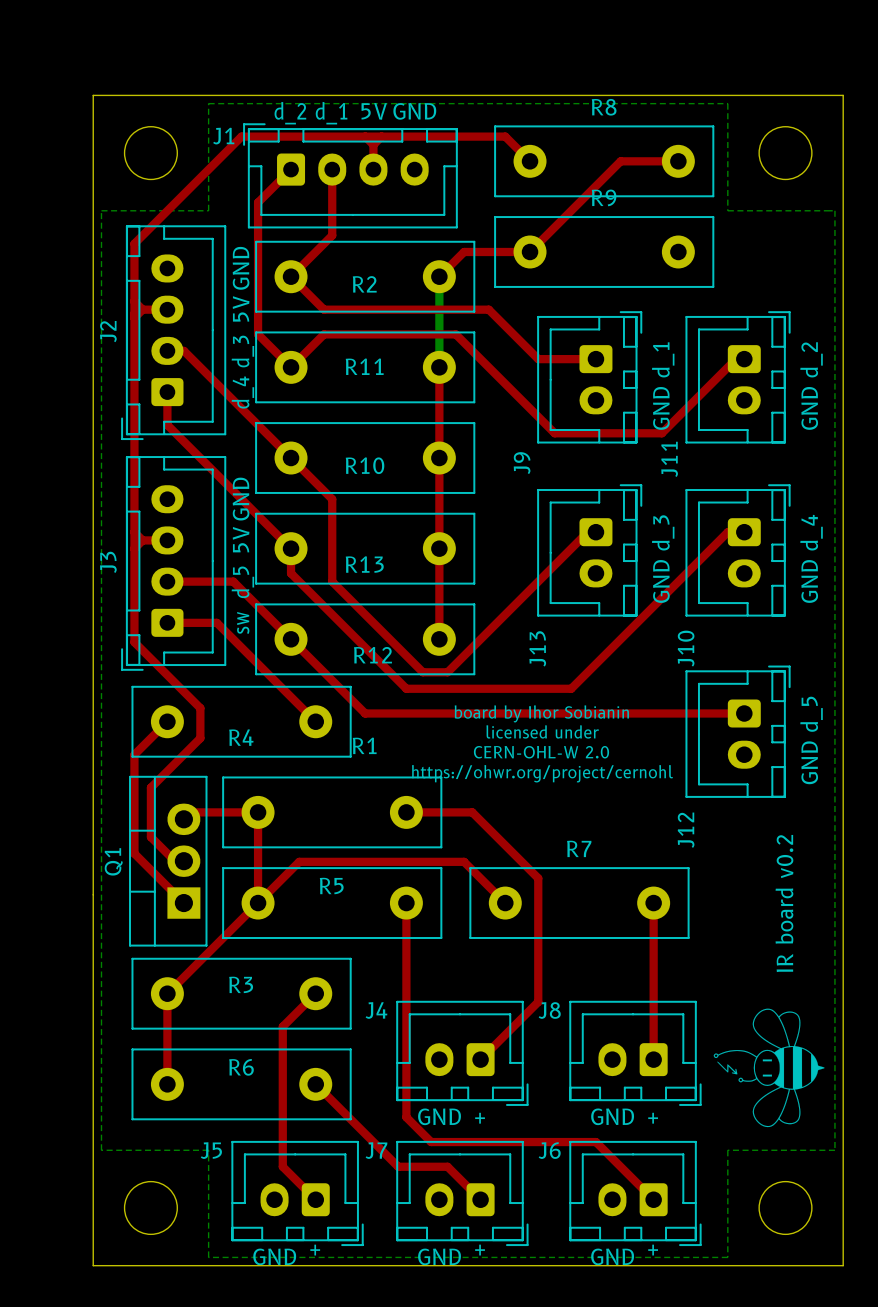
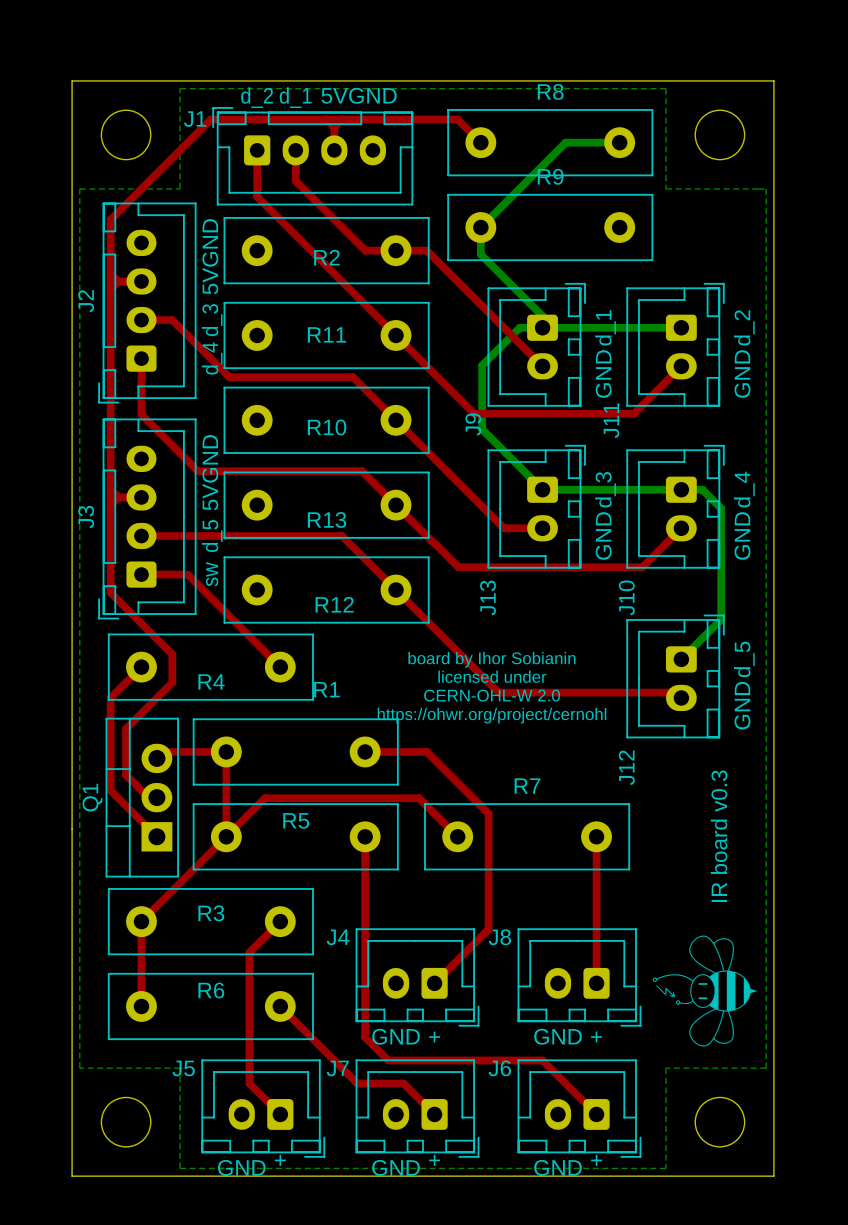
top track: (678, 161) (620, 161) (530, 251) (464, 251) (439, 276) -> none
bottom track: none -> (619, 142) (565, 142) (480, 227) (480, 254) (542, 316) (542, 327)
top track: (291, 169) (258, 202) (258, 334) (291, 367) (324, 334) (455, 334) (554, 433) (661, 433) (736, 359) (744, 359) -> (257, 150) (257, 196) (474, 413) (633, 413) (681, 366)
top track: (332, 202) (332, 235) (291, 276) (324, 309) (488, 309) (538, 359) (595, 359) -> (295, 180) (365, 250) (426, 250) (542, 366)
bottom track: (439, 276) (439, 367) -> none
top track: (183, 350) (332, 499) (332, 581) (422, 672) (447, 672) (587, 532) (595, 532) -> (156, 320) (172, 320) (229, 377) (352, 377) (503, 528) (542, 528)
bottom track: none -> (681, 327) (519, 327) (482, 365) (482, 429) (542, 489) (702, 489) (721, 508) (721, 619) (681, 659)
top track: (439, 367) (439, 639) -> none
top track: (167, 425) (291, 548) (291, 573) (406, 688) (571, 688) (727, 532) (744, 532) -> (141, 389) (141, 414) (198, 471) (362, 471) (458, 567) (642, 567) (681, 528)
top track: (233, 581) (365, 713) (744, 713) -> (203, 536) (342, 536) (498, 692) (675, 692) (681, 697)
text: IR board v0.2 (784, 903) -> IR board v0.3 (719, 836)

